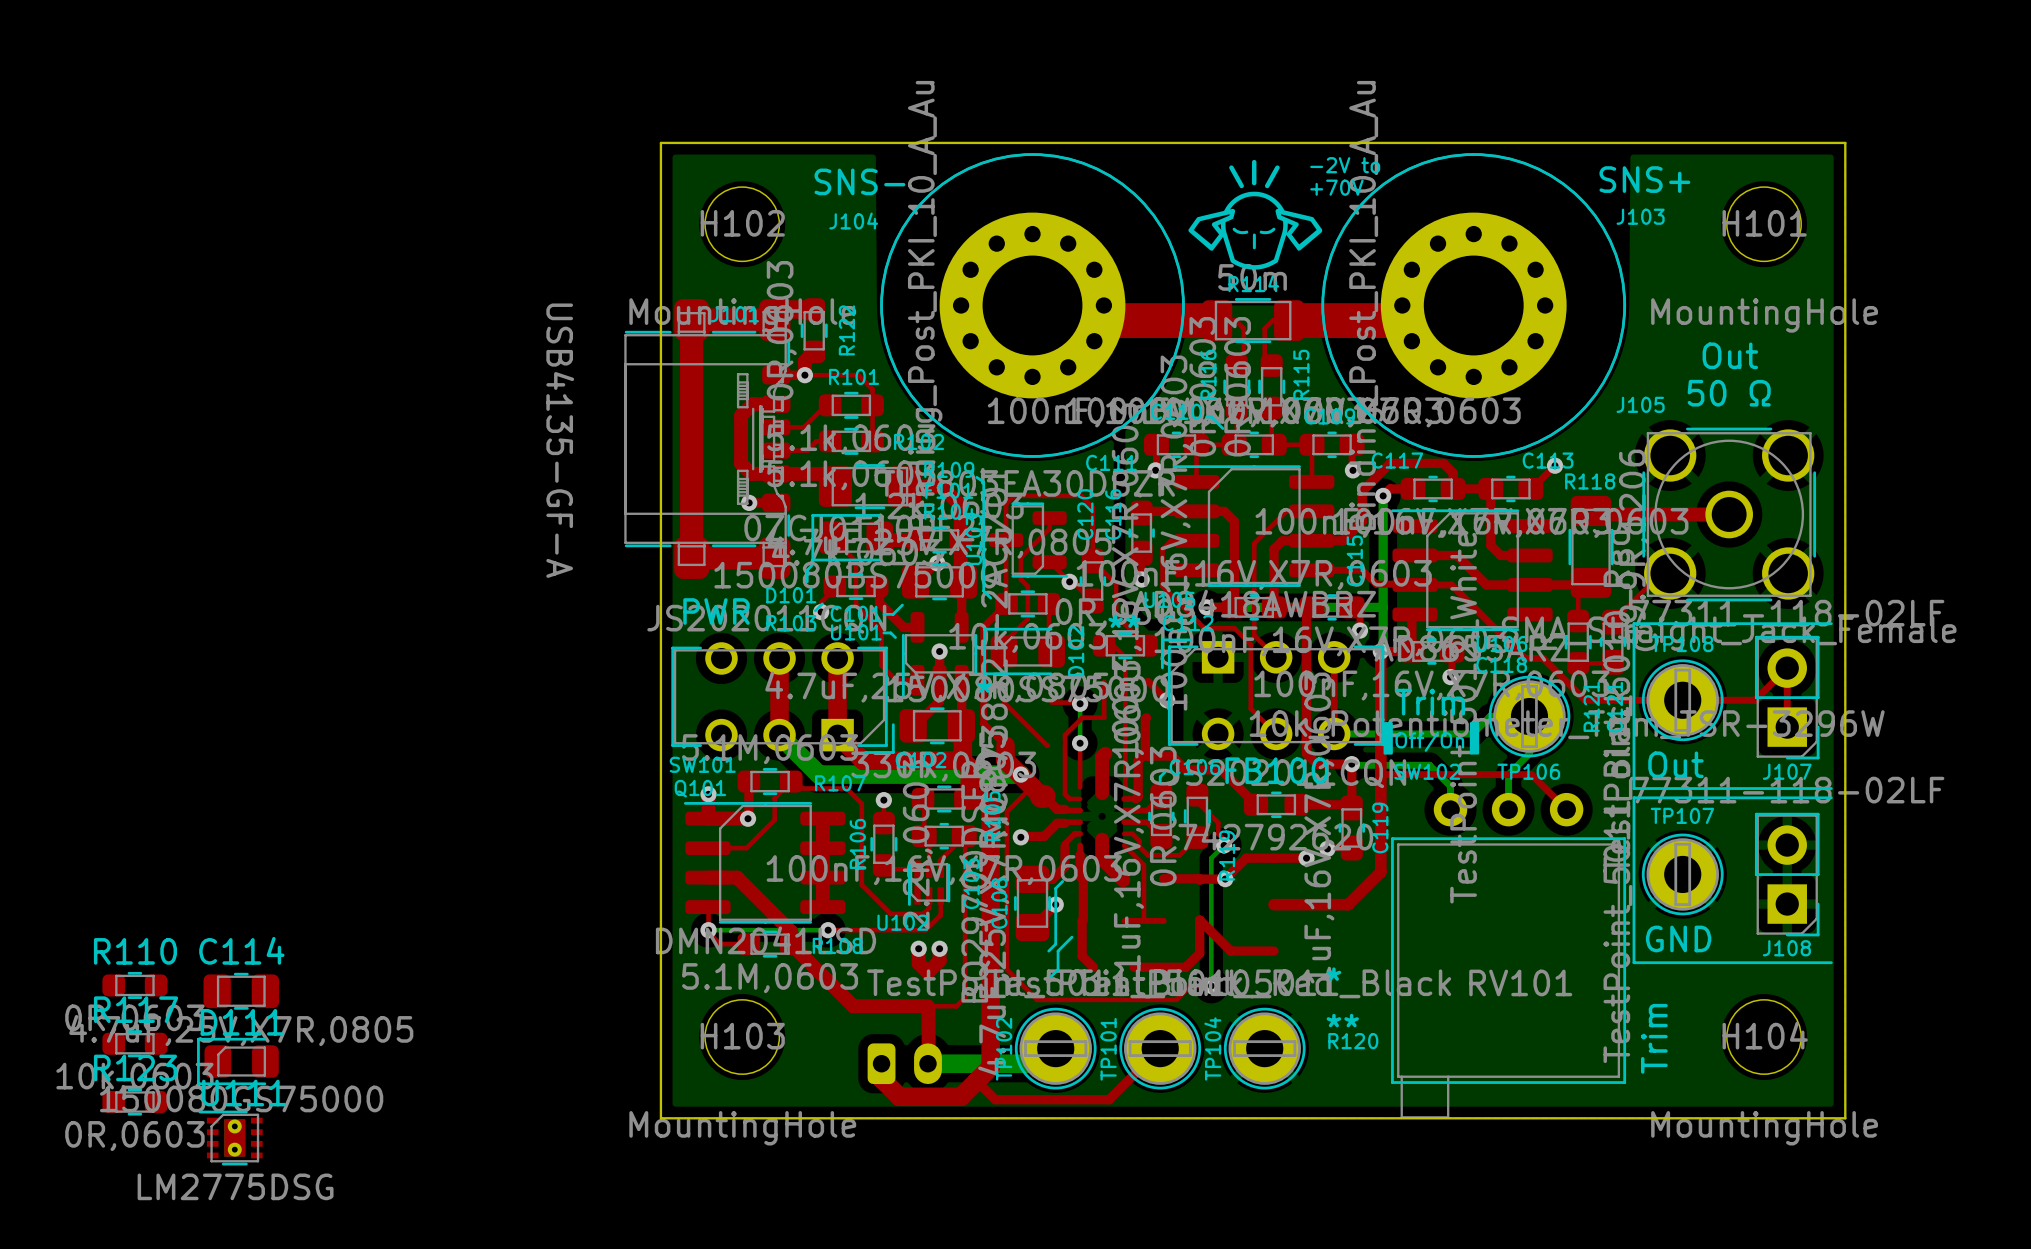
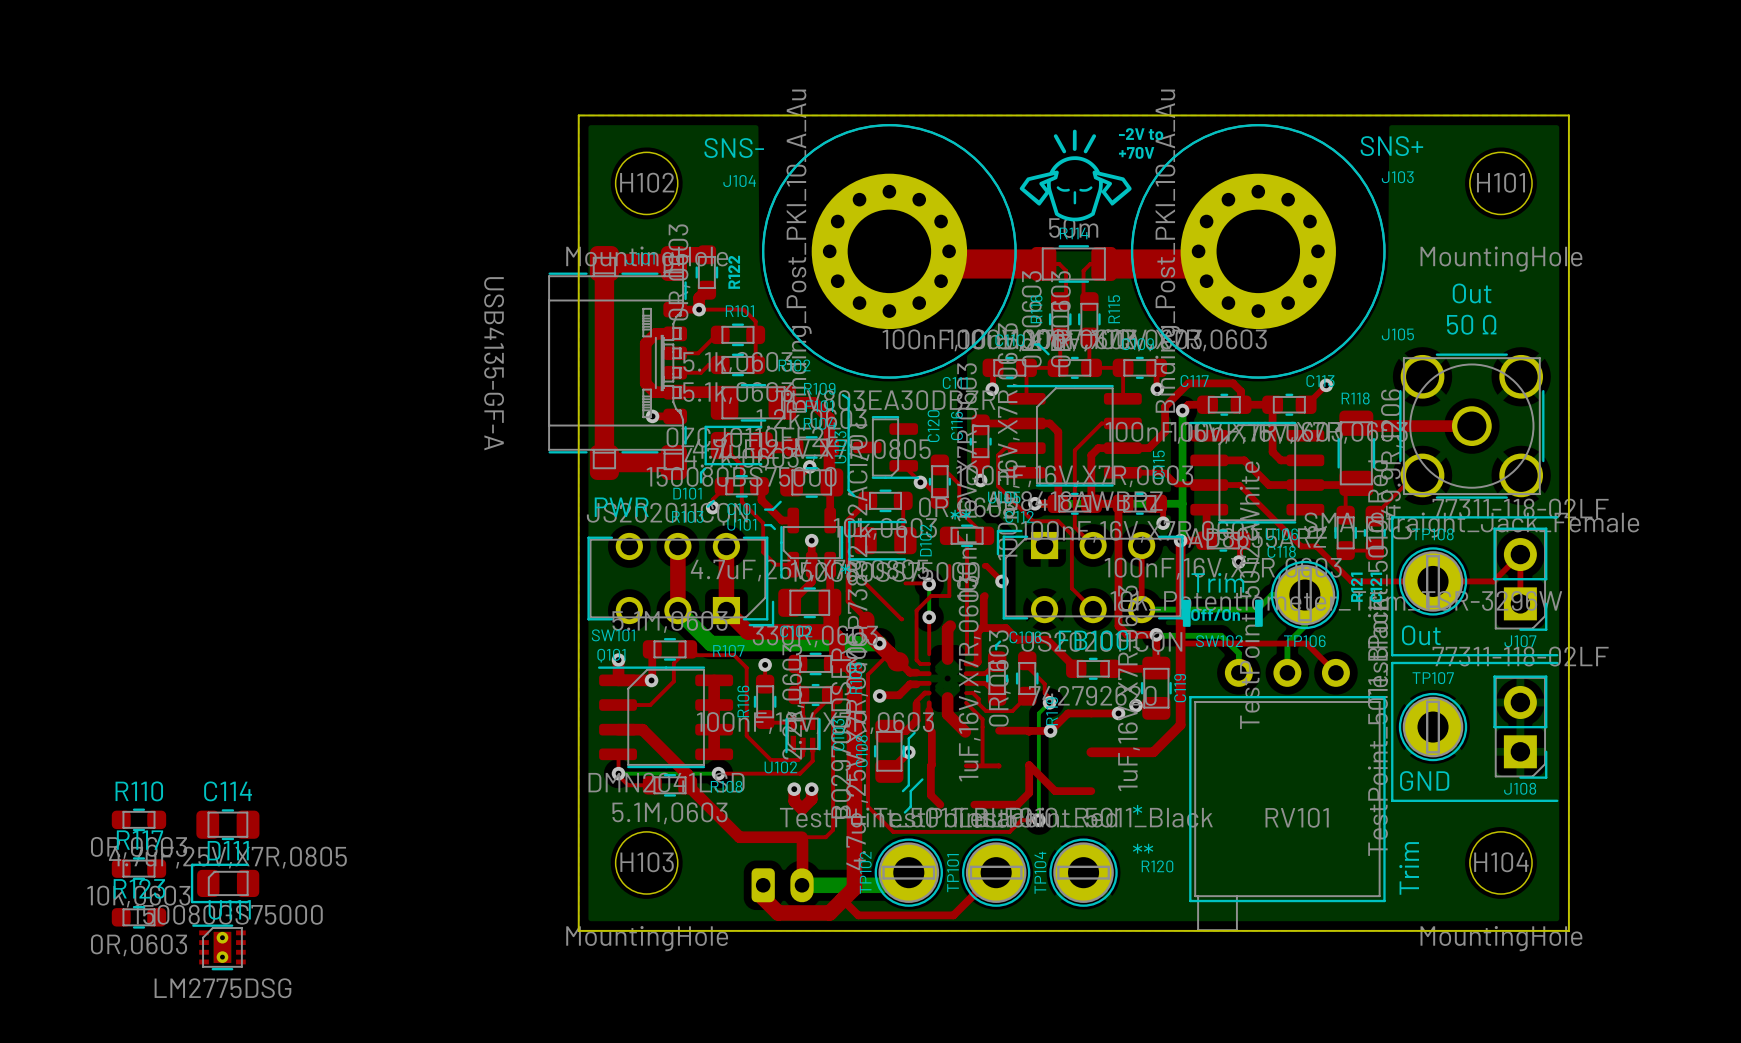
top track: (1049, 517) (1049, 528) (1020, 557) (1020, 579) (1027, 586) (1027, 619) (1004, 642) -> none
top track: (1092, 560) (1092, 507) (1081, 495) (1013, 495) (1006, 503) (1006, 603) -> none
C119 footprint: [1338, 795, 1366, 861] -> [1140, 656, 1172, 720]

